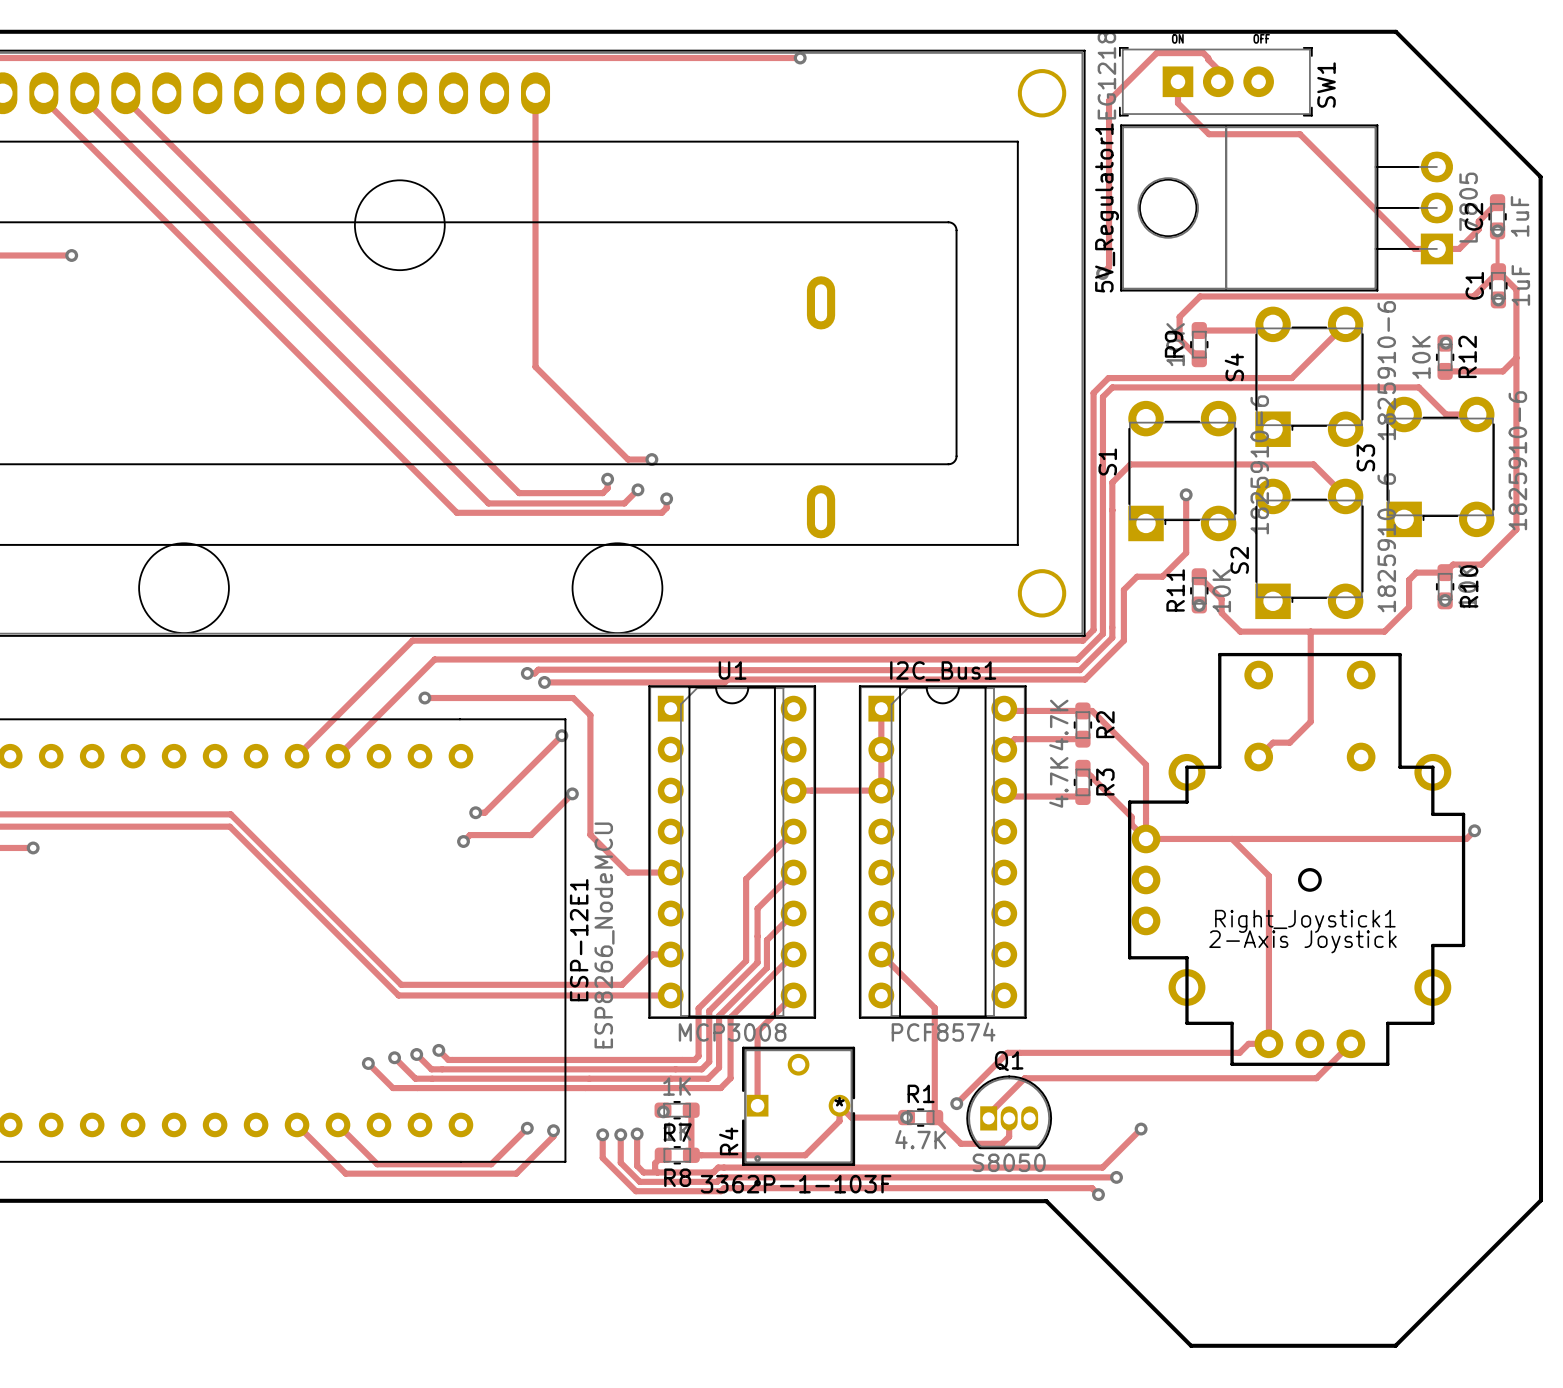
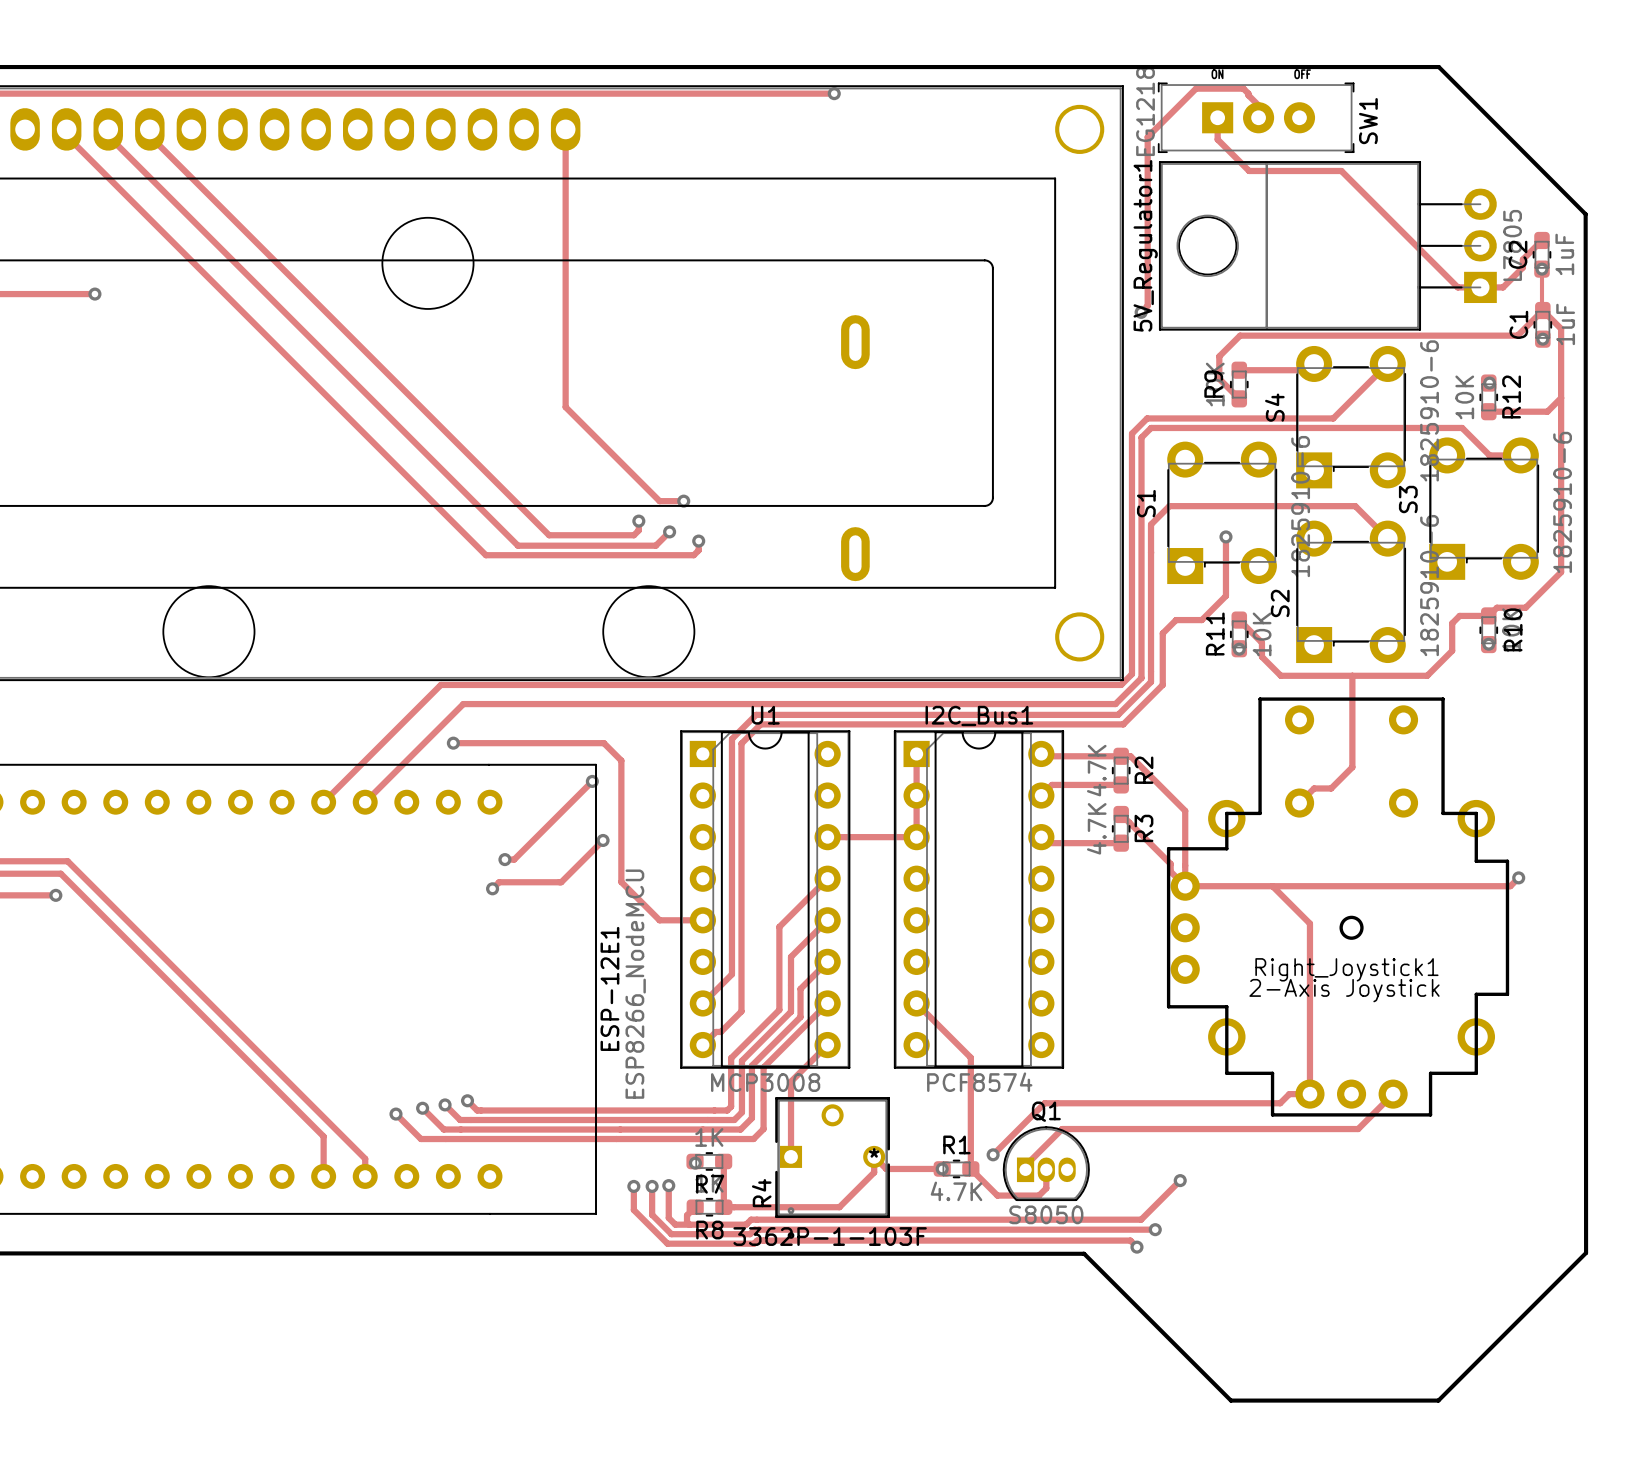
track: (723, 670) (538, 669) (534, 673) (527, 673) -> (756, 714) (731, 739) (731, 974) (702, 1003)
via: (527, 673) -> none
track: (544, 682) (724, 682) -> (702, 1045) (715, 1031) (720, 1031) (741, 1011) (741, 743) (757, 727)
via: (544, 682) -> none
track: (44, 814) (230, 814) (401, 984) (622, 984) (652, 954) (670, 954) -> (67, 861) (365, 1158) (365, 1176)
track: (38, 826) (229, 826) (398, 995) (670, 995) -> (60, 873) (323, 1136) (323, 1176)
track: (297, 1124) (345, 1173) (516, 1173) (553, 1136) (553, 1130) -> none
track: (338, 1124) (377, 1164) (491, 1164) (527, 1128) -> none
via: (527, 1128) -> none
via: (553, 1130) -> none

